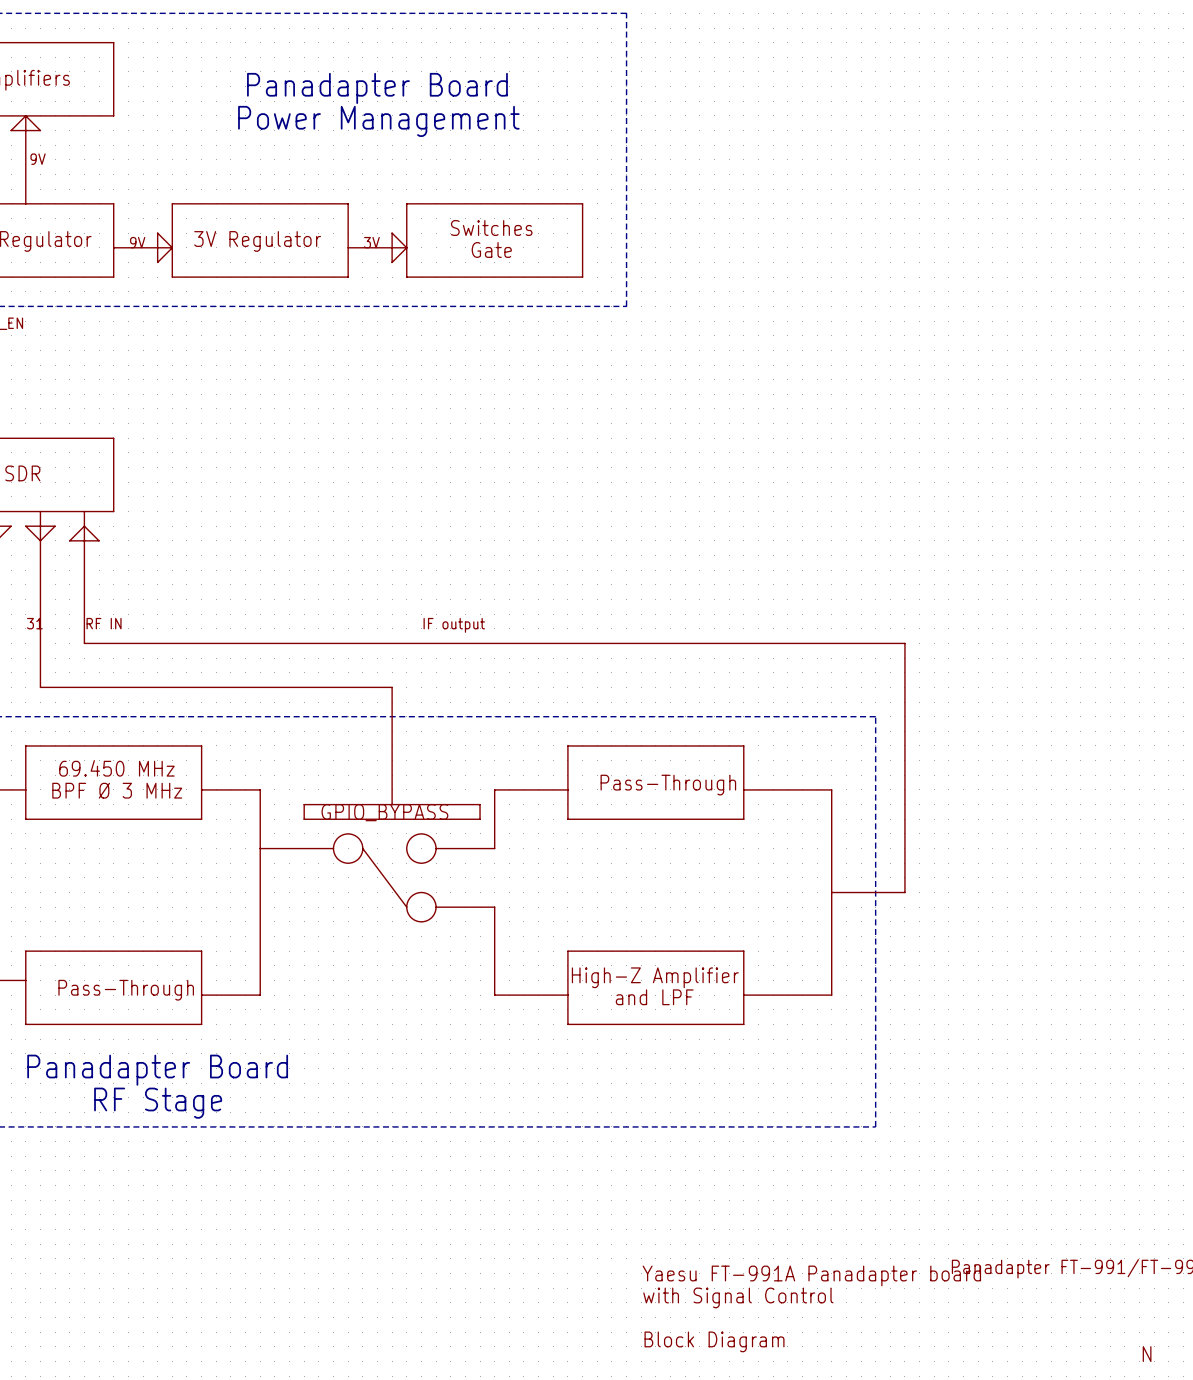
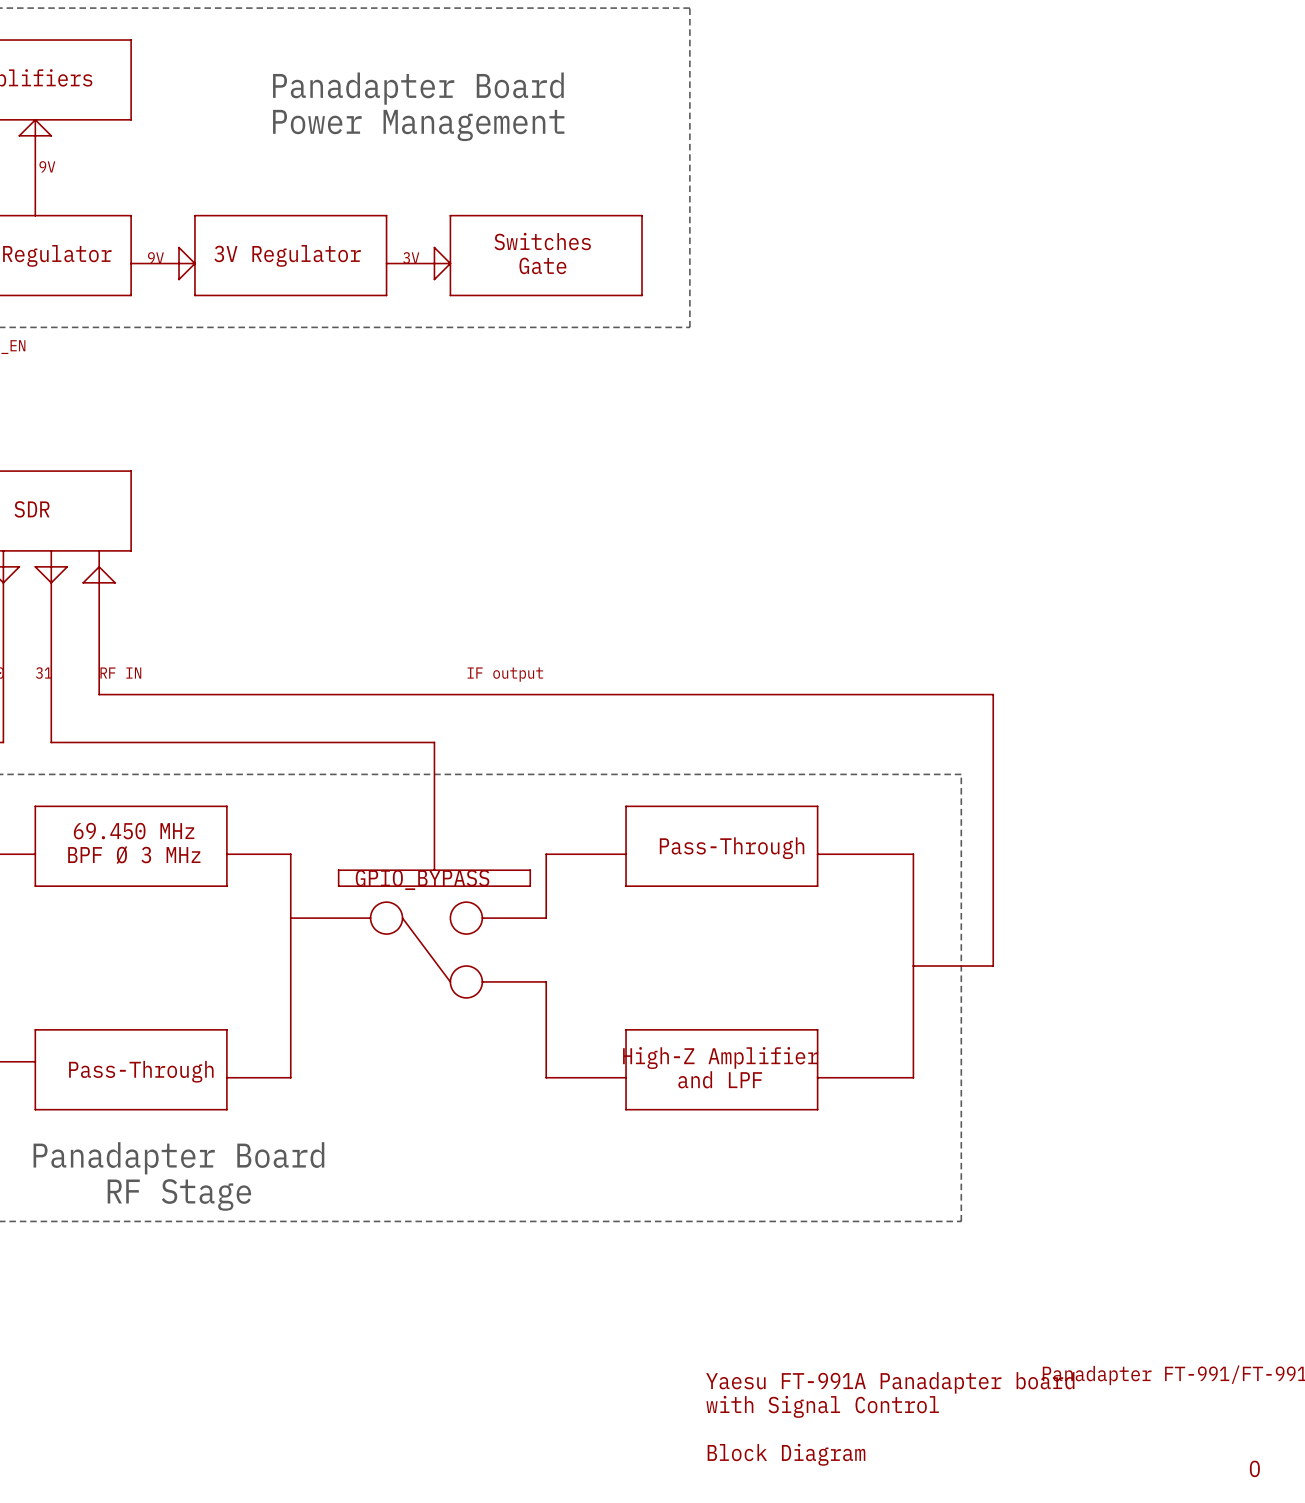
text: N (1147, 1354) -> O (1254, 1468)

